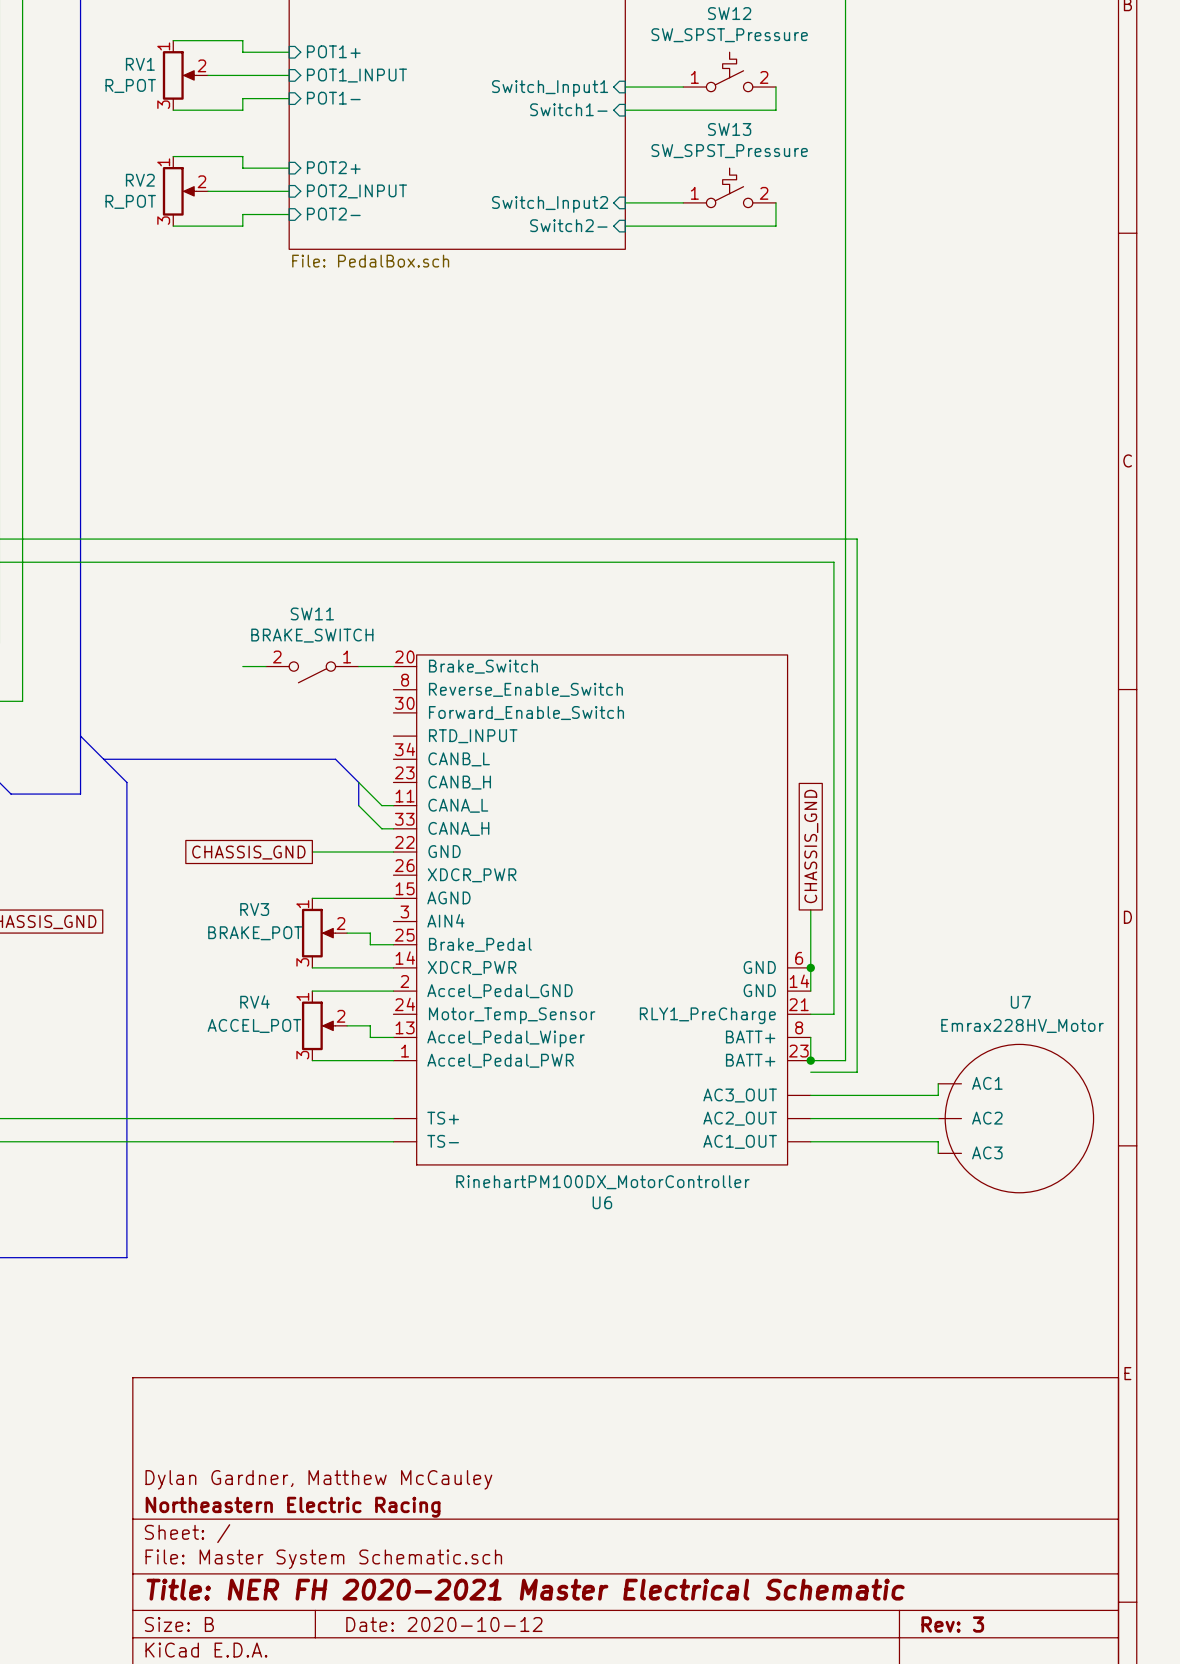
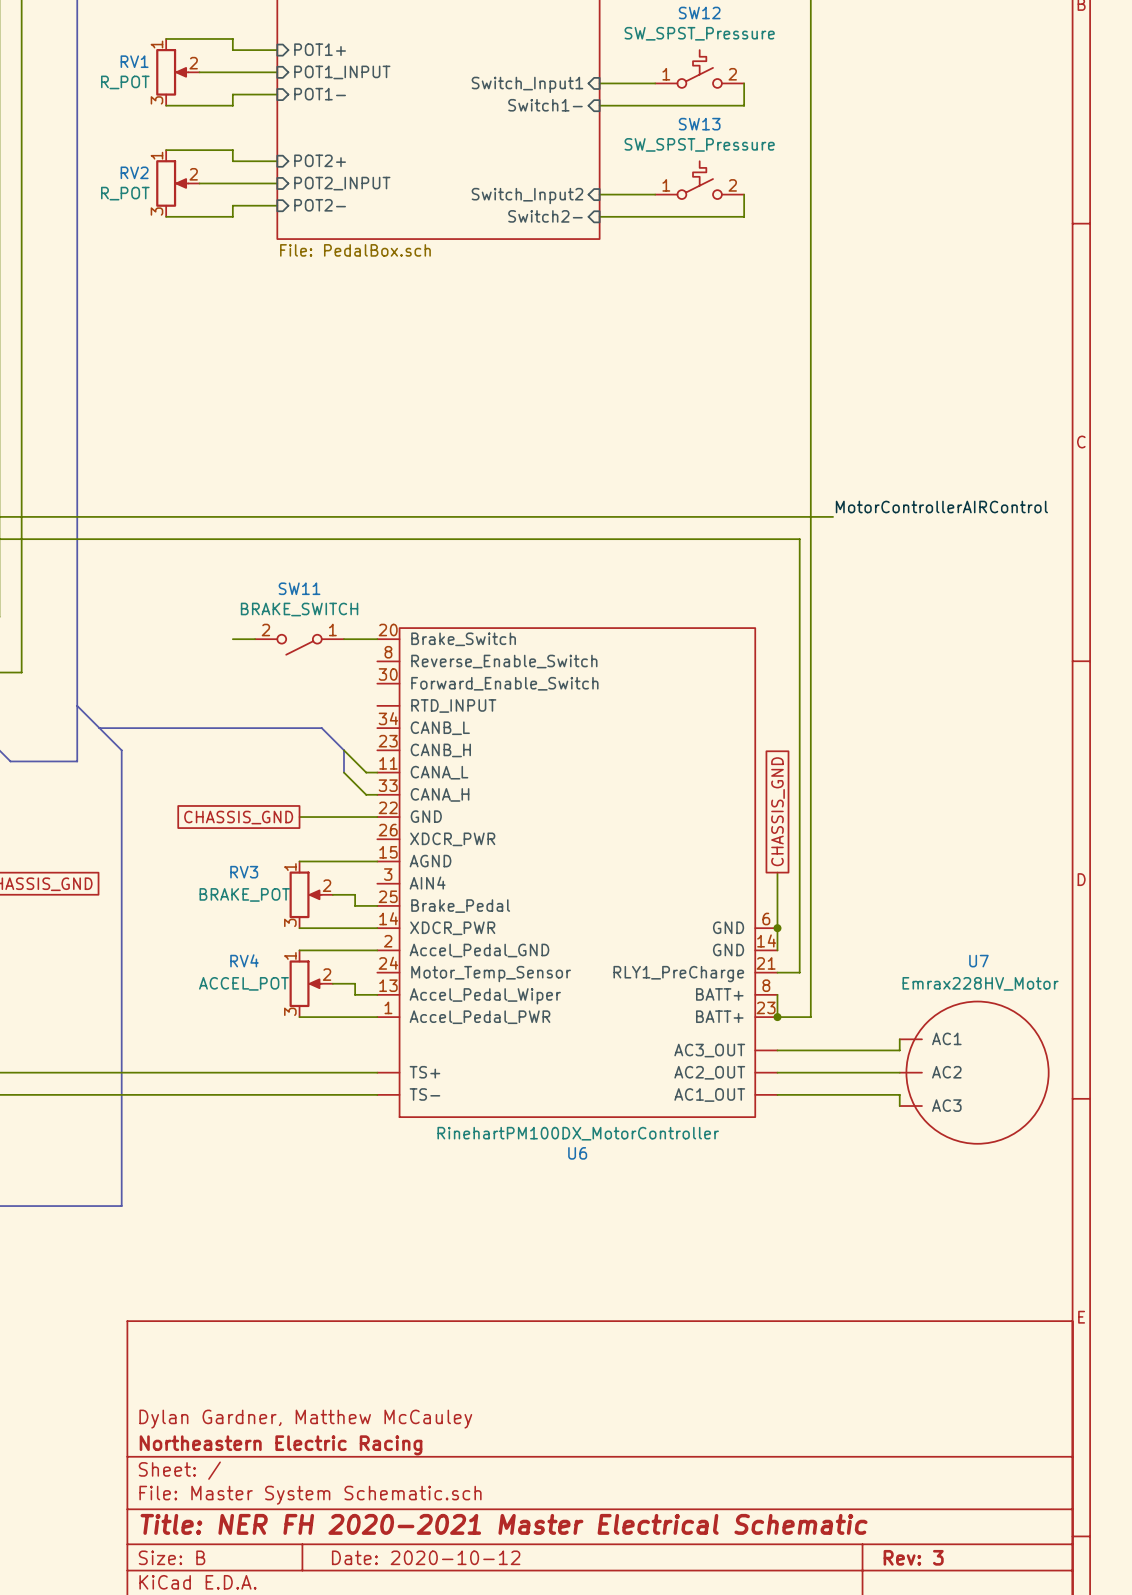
label: none -> MotorControllerAIRControl (941, 507)
wire: (857, 539) (857, 1072) (810, 1072) -> (821, 516) (833, 516)

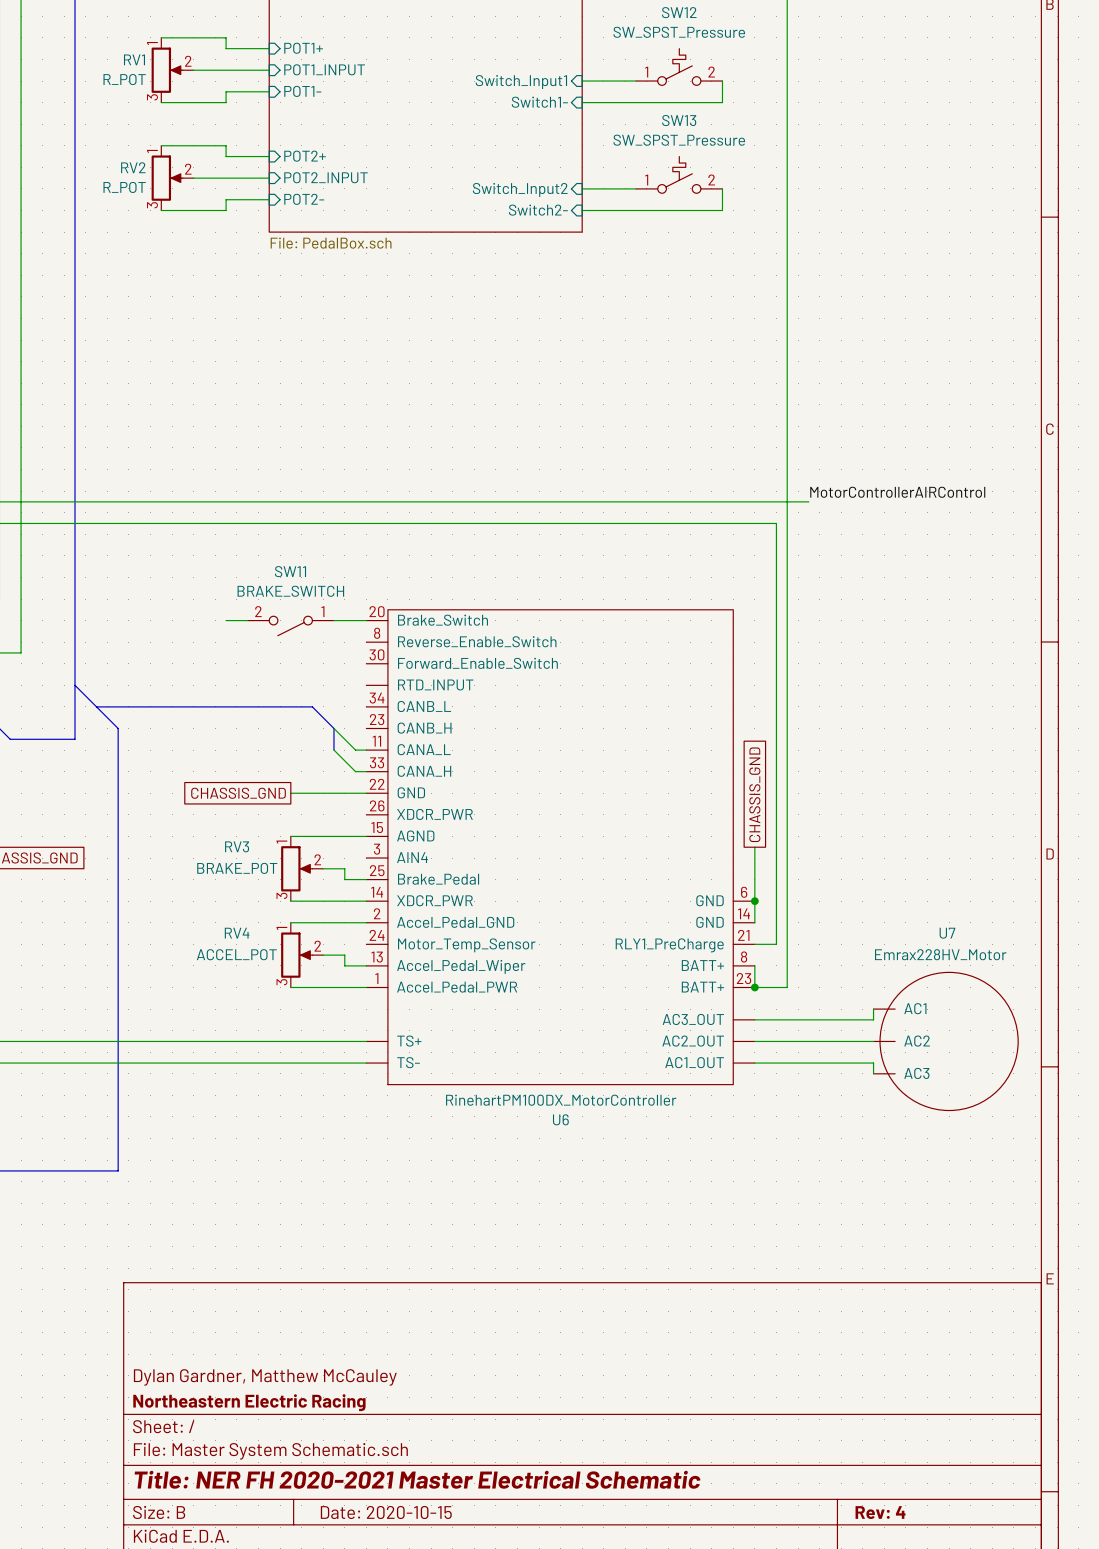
title block: Date: 2020-10-12 (426, 1557) -> Date: 2020-10-15 (386, 1512)
title block: Rev: 3 (913, 1557) -> Rev: 4 (880, 1512)

